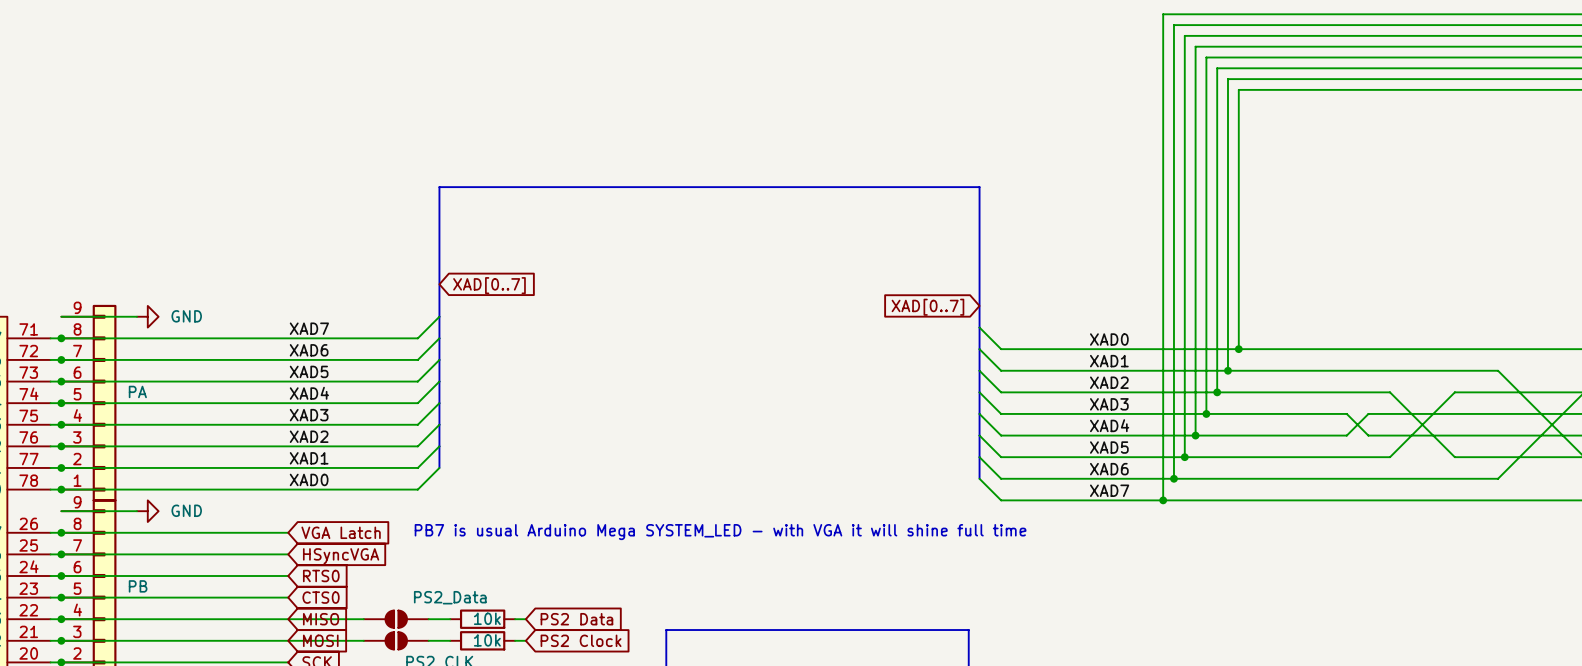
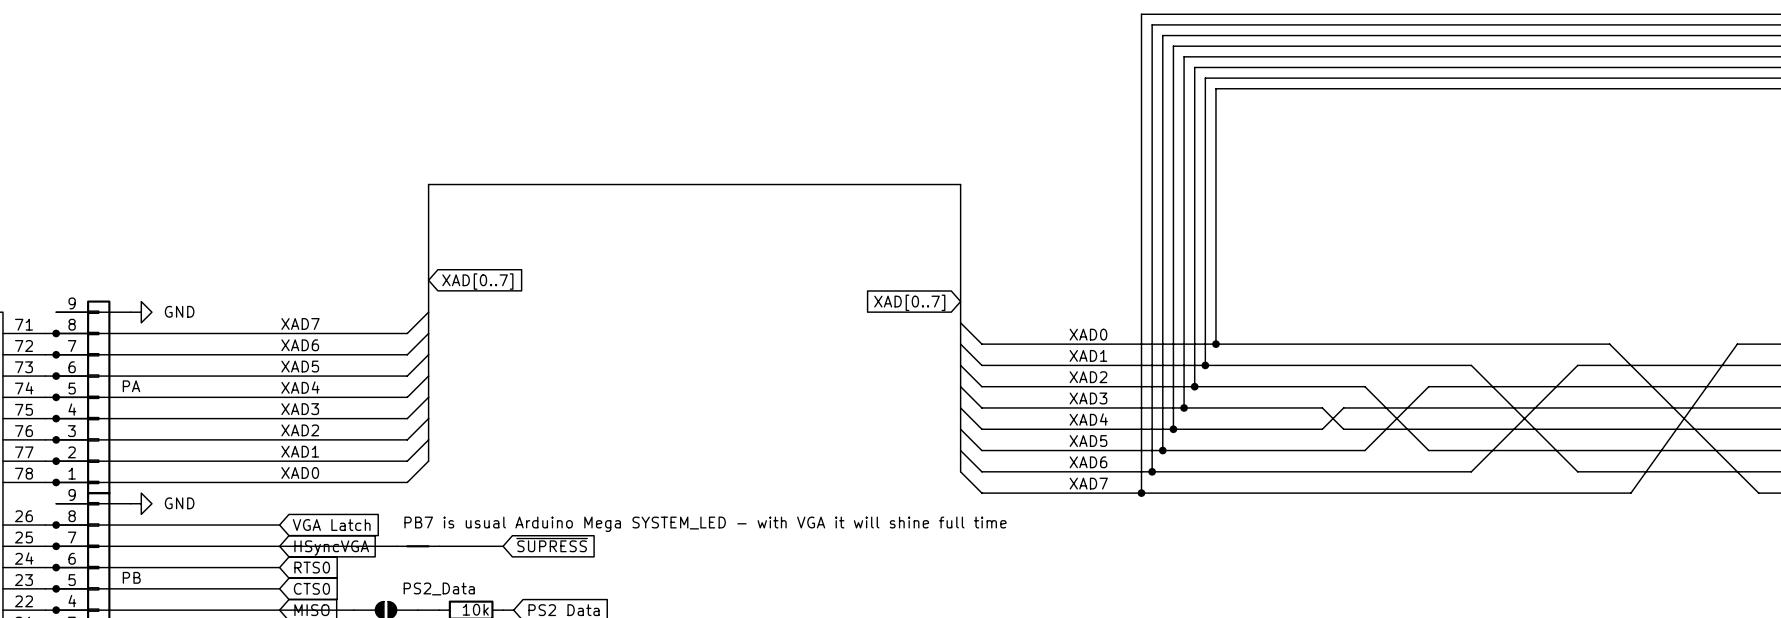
global label: none -> ~{SUPRESS} (552, 545)
wire: none -> (279, 546) (396, 546)
part: none -> (417, 546)
wire: none -> (439, 546) (503, 546)

